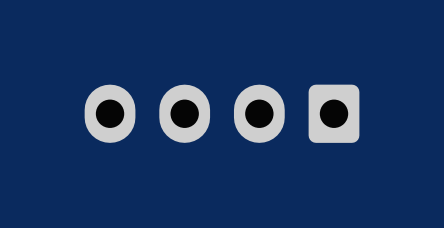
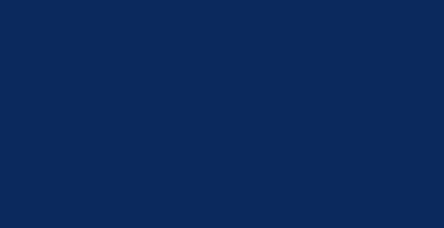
part: (222, 113) -> none

